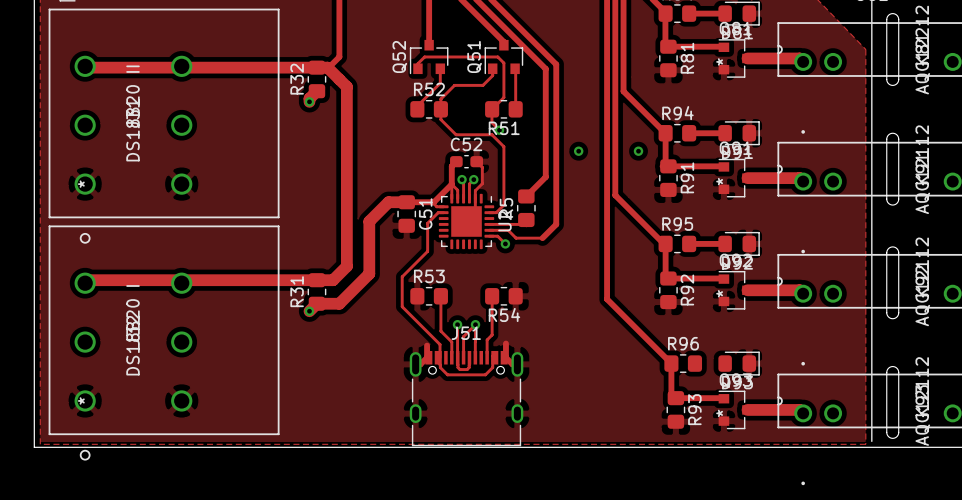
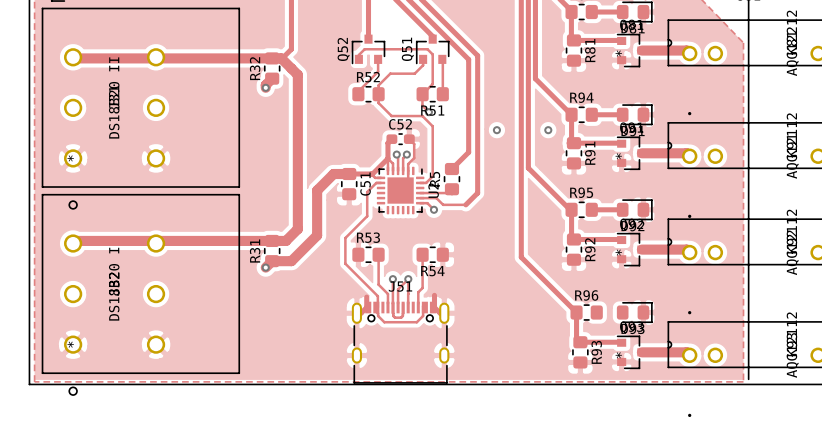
board edge: (886, 19) (886, 80) (889, 84) (893, 85) (898, 80) (898, 18) (892, 13) (888, 15) (886, 19) -> none
board edge: (886, 139) (886, 199) (889, 203) (893, 204) (898, 199) (898, 138) (892, 133) (888, 135) (886, 139) -> none
board edge: (886, 252) (886, 313) (889, 317) (893, 318) (898, 313) (898, 252) (892, 246) (888, 248) (886, 252) -> none
board edge: (886, 372) (886, 433) (889, 437) (893, 438) (898, 433) (898, 371) (892, 366) (888, 368) (886, 372) -> none

